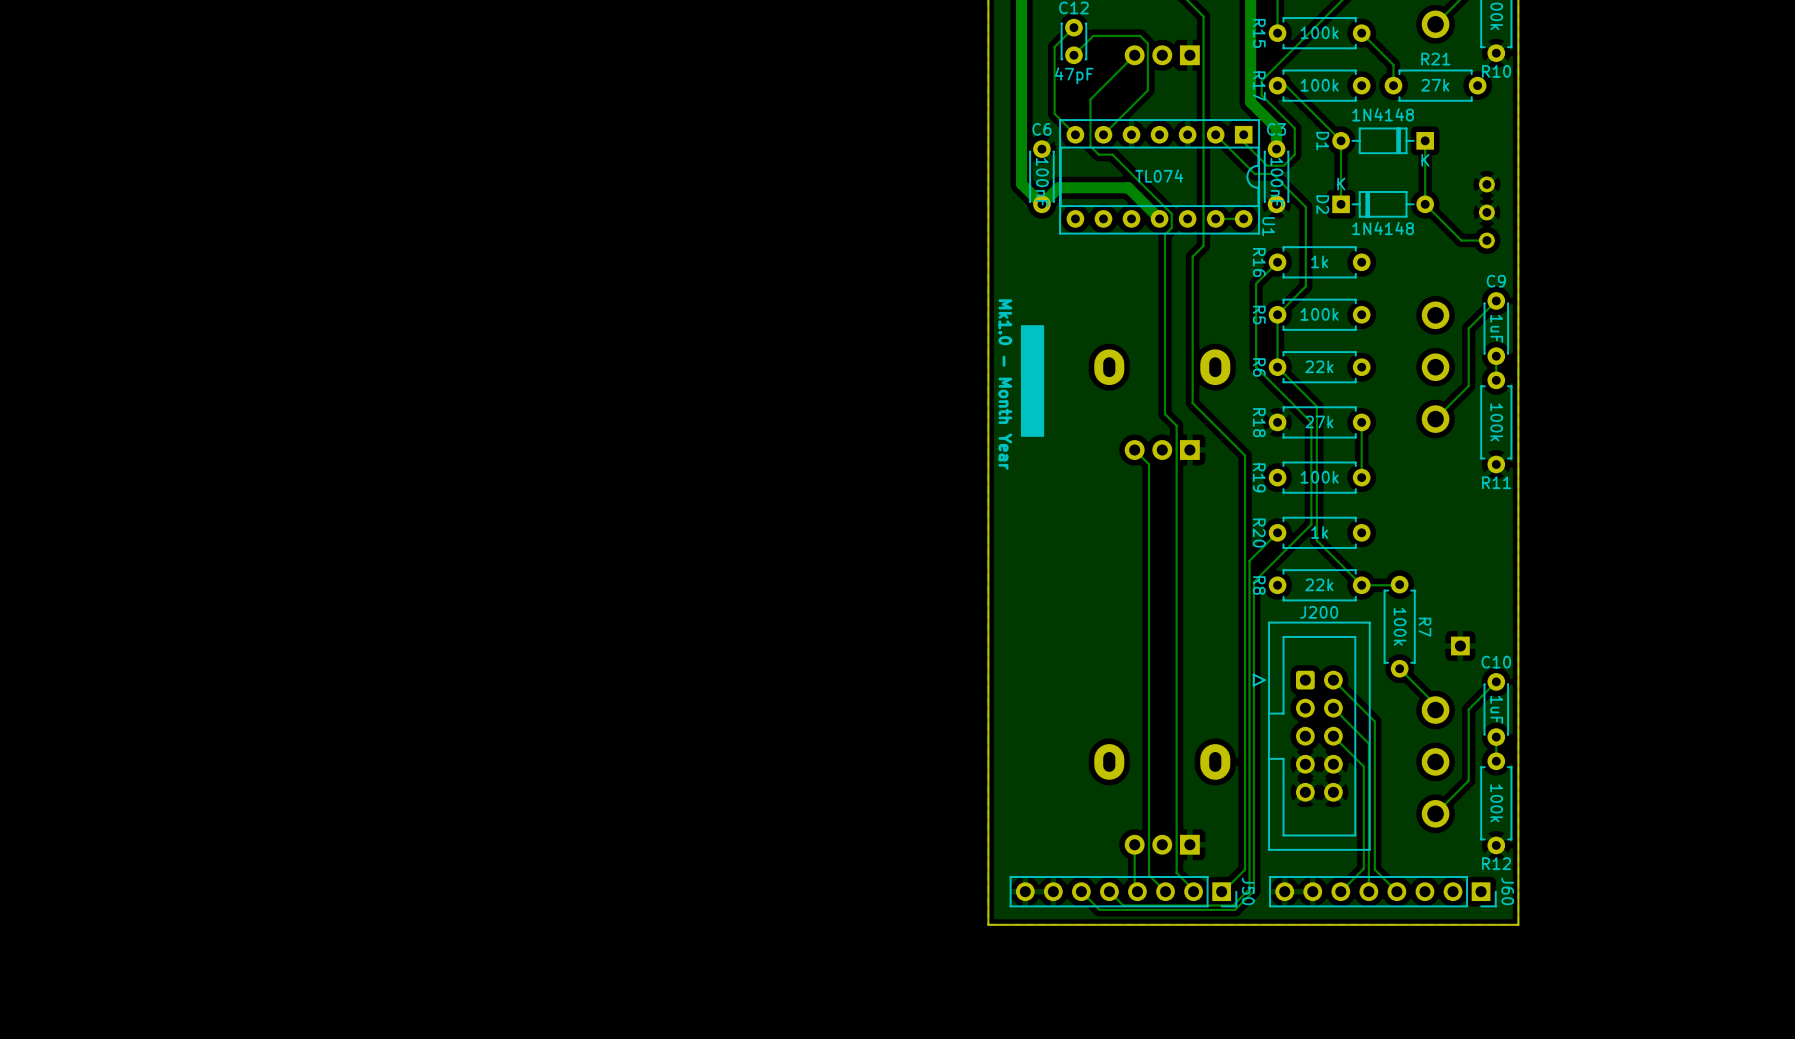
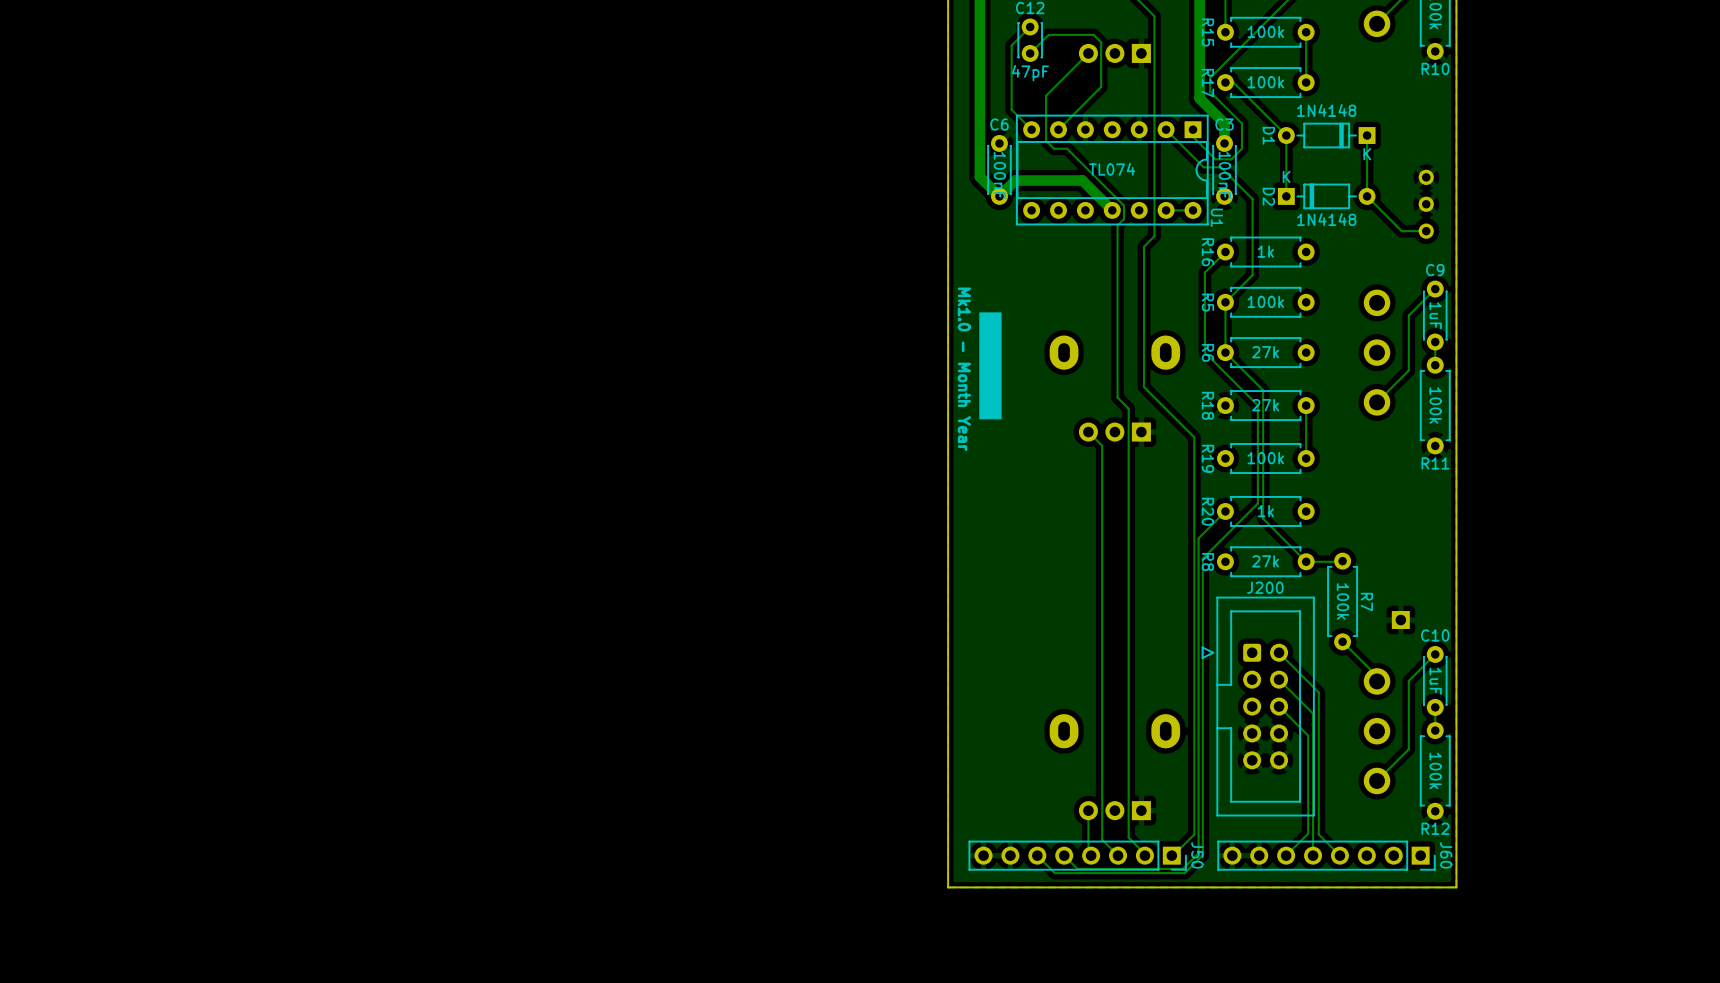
track: (1361, 33) (1393, 64) (1393, 85) -> (1306, 32) (1306, 82)
R21: 27k (1435, 85) -> none
R6 value: 22k (1319, 366) -> 27k (1265, 352)
R8 value: 22k (1319, 584) -> 27k (1265, 561)

